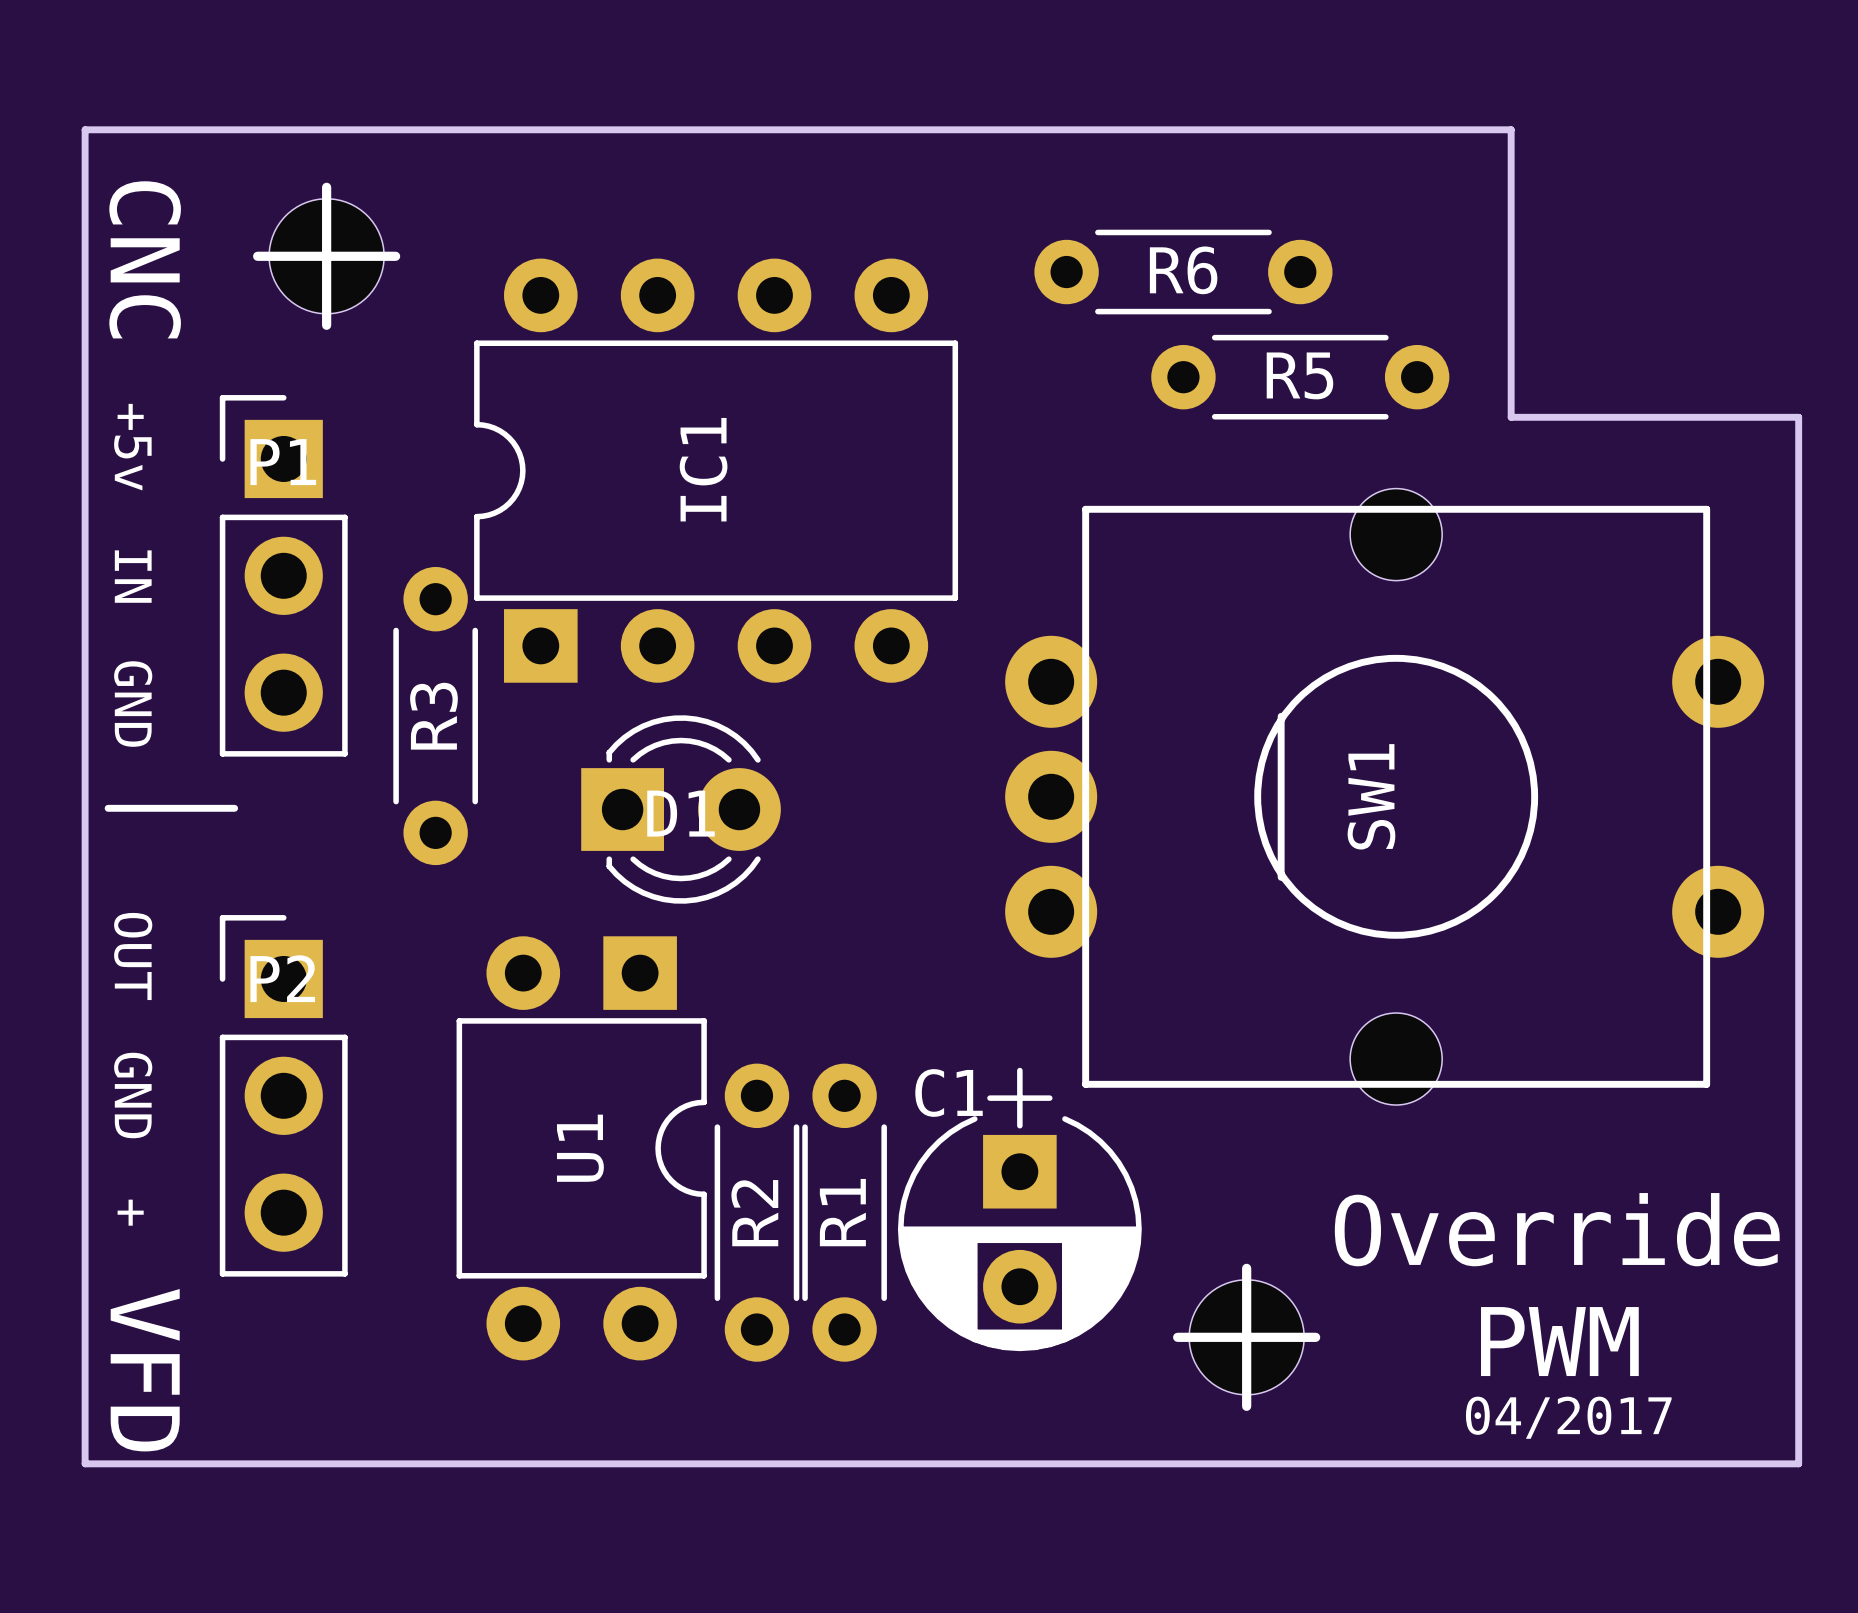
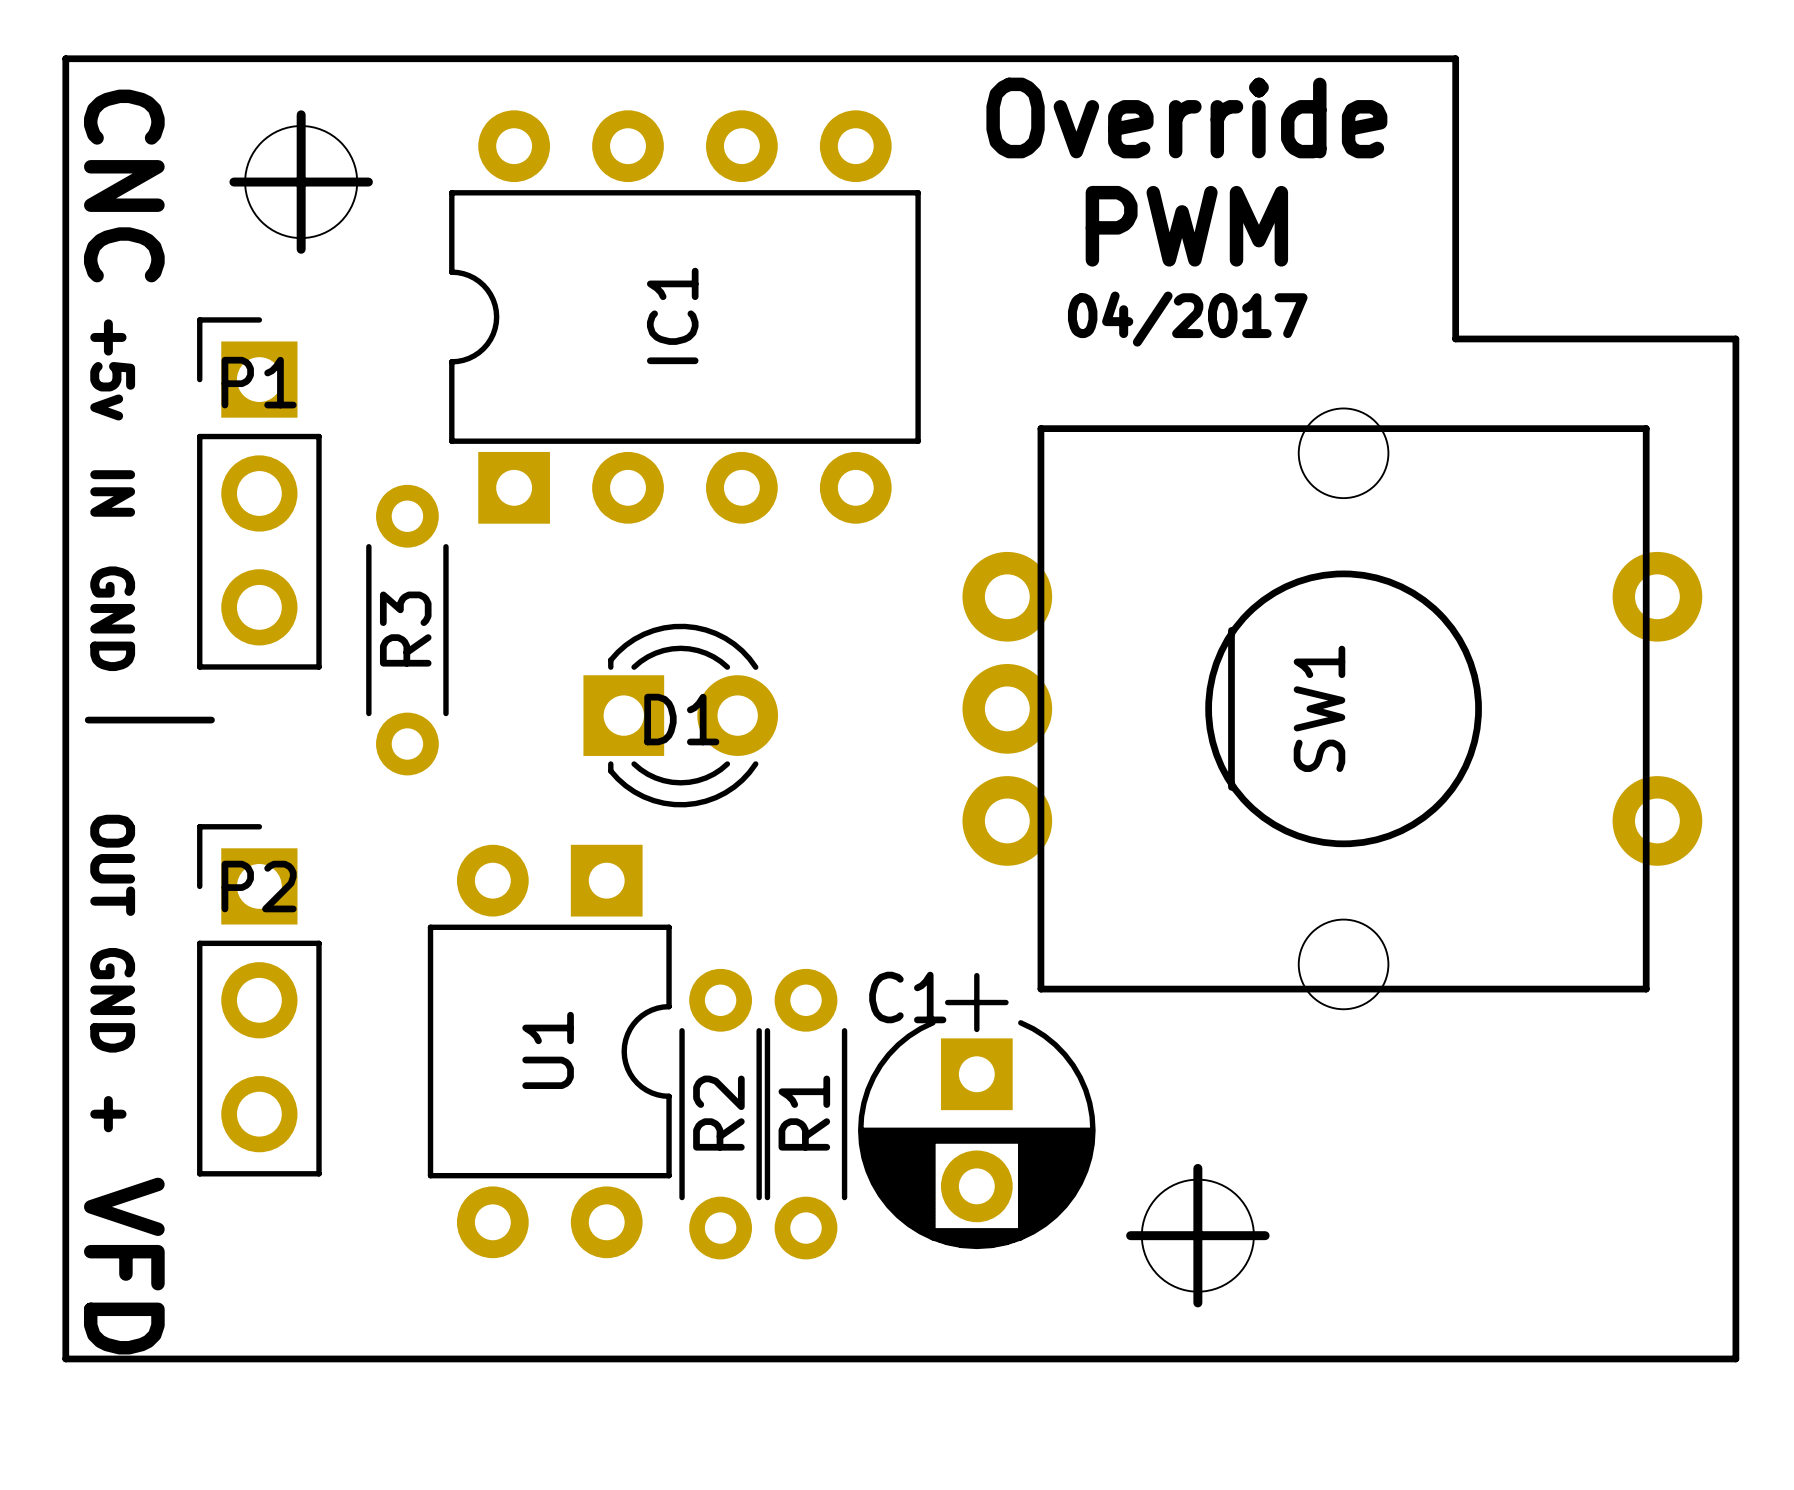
R6: (1183, 272) -> none
R5: (1300, 377) -> none
IC1 position: (716, 470) -> (684, 317)
D1 position: (681, 809) -> (680, 715)
text position: Override (1557, 1229) -> Override (1186, 117)
text position: PWM (1559, 1341) -> PWM (1186, 226)
text position: 04/2017 (1568, 1417) -> 04/2017 (1187, 319)

